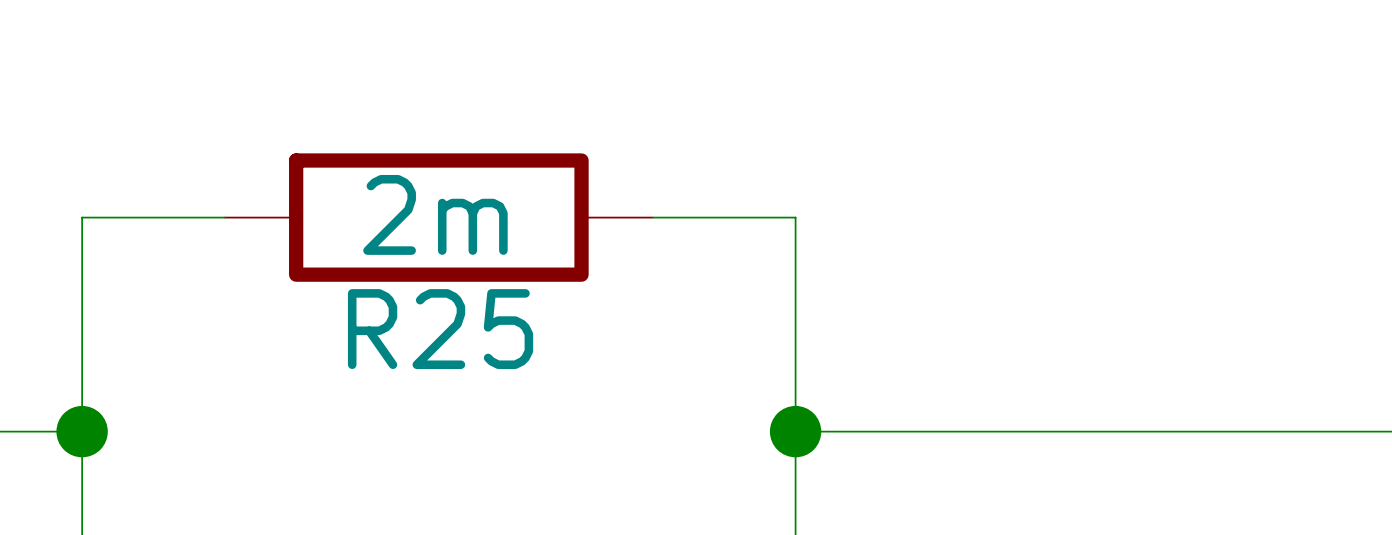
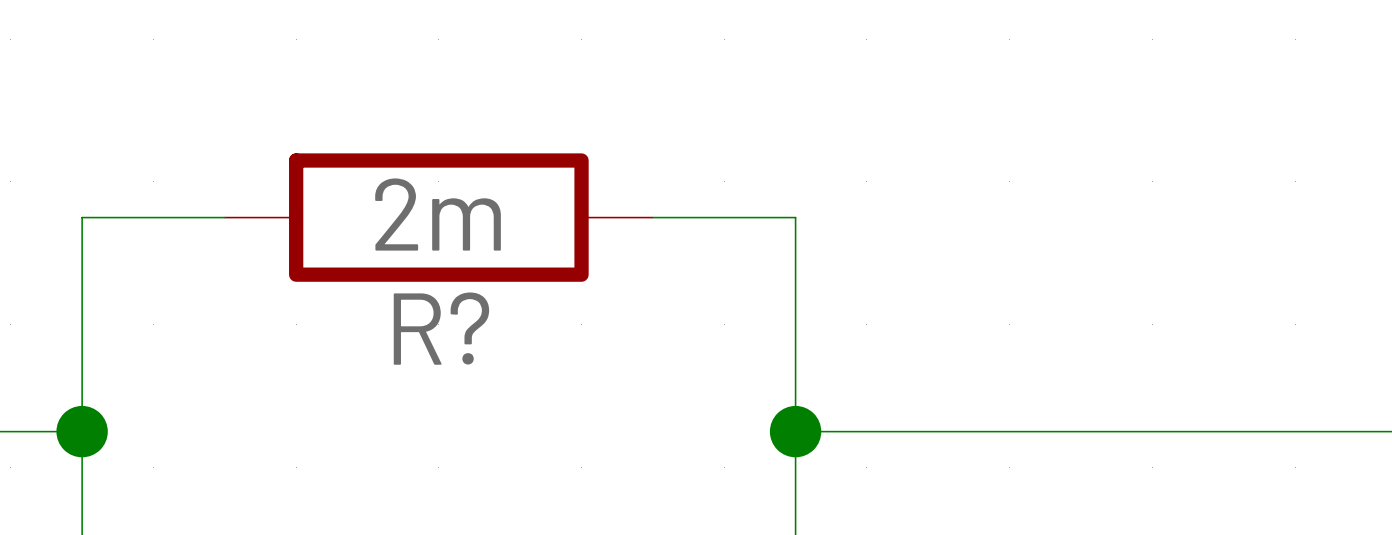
R25 name: R25 (440, 329) -> R? (441, 328)

